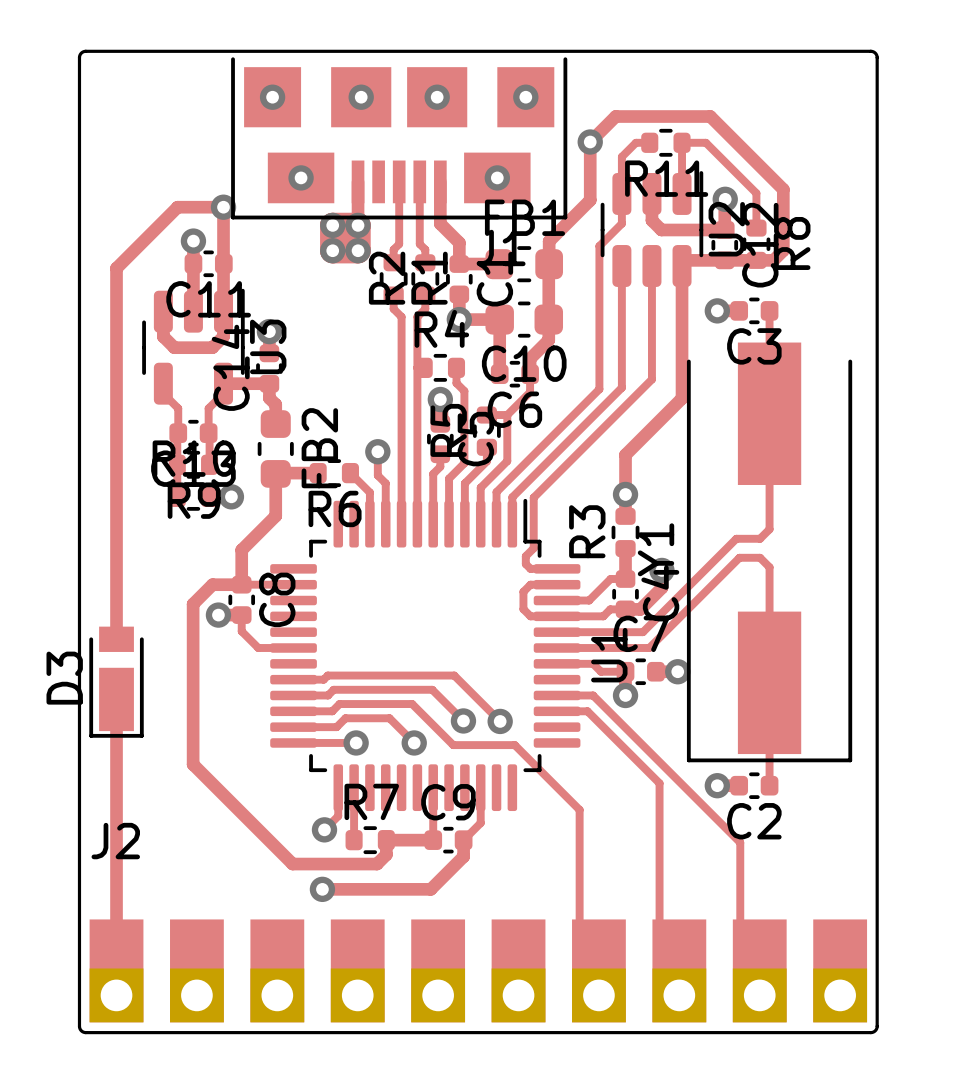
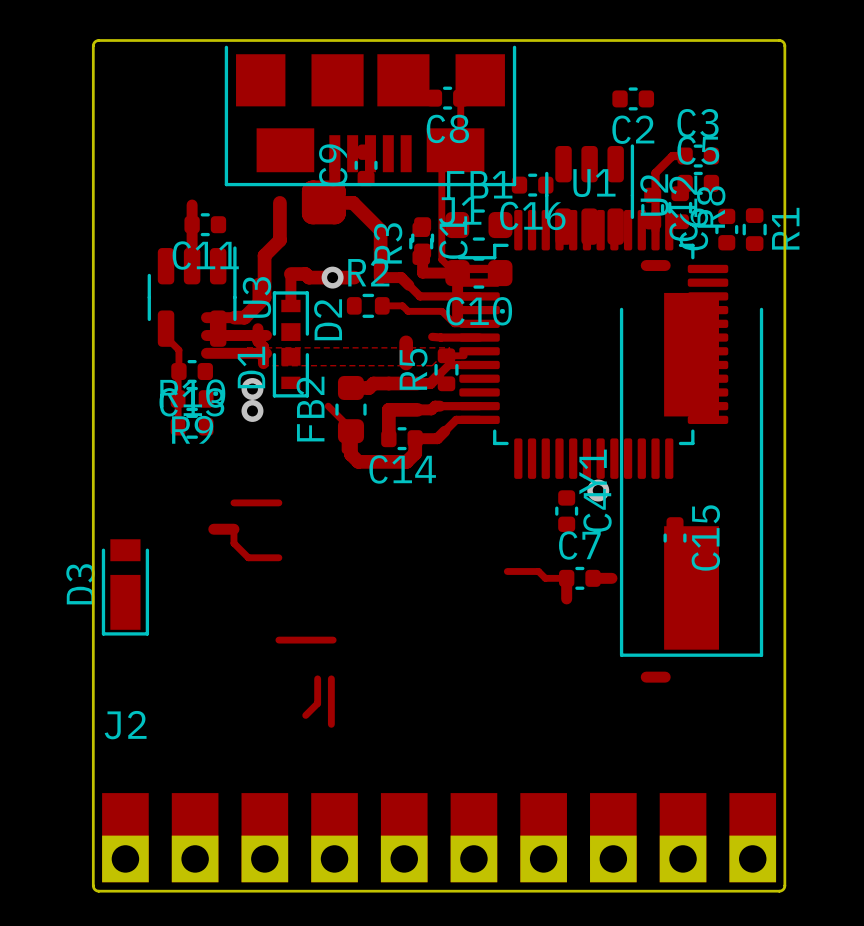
via: (272, 97) -> none
via: (361, 97) -> none
via: (437, 97) -> none
via: (525, 97) -> none
track: none -> (460, 98) (460, 129) (472, 140) (460, 152) (449, 152) (441, 159) (441, 259) (451, 268) (479, 268)
via: (590, 142) -> none
track: (649, 142) (635, 142) (621, 156) (621, 223) (599, 246) (599, 389) (496, 492) (496, 524) -> none
R11: (665, 142) -> none
via: (301, 177) -> none
via: (497, 177) -> none
track: (399, 181) (399, 244) (393, 249) (393, 262) -> none
track: (419, 181) (419, 244) (425, 249) (425, 262) -> none
track: (440, 181) (440, 223) (459, 242) (459, 264) (499, 264) -> none
track: none -> (685, 156) (672, 156) (655, 172) (655, 230)
track: (651, 193) (651, 220) (661, 229) (724, 229) (725, 199) -> none
track: (682, 193) (682, 142) (705, 142) (756, 193) (756, 228) -> none
via: (725, 199) -> none
via: (223, 207) -> none
C16: none -> (532, 185)
via: (332, 225) -> none
via: (358, 225) -> none
track: none -> (279, 202) (279, 240) (264, 255) (264, 297) (244, 317) (206, 317)
track: none -> (326, 202) (353, 202) (380, 230) (380, 277) (401, 277) (420, 296) (479, 296)
via: (193, 241) -> none
via: (332, 250) -> none
via: (358, 250) -> none
track: (223, 263) (223, 207) (177, 207) (116, 268) (116, 639) -> none
track: (223, 264) (223, 336) (212, 347) (174, 347) (163, 336) (163, 311) -> none
track: (548, 264) (548, 340) (530, 358) (530, 392) (507, 415) (507, 461) (480, 487) (480, 524) -> none
track: (549, 264) (549, 241) (590, 200) (590, 142) (615, 116) (710, 116) (783, 189) (783, 250) (773, 260) (687, 260) (682, 265) (682, 398) (625, 454) (625, 516) -> none
track: (621, 265) (621, 387) (512, 497) (512, 524) -> none
track: (651, 265) (651, 379) (533, 497) (533, 548) (525, 556) (525, 564) (530, 568) (557, 568) -> none
R1 position: (393, 278) -> (754, 229)
R2 rotation: 0° (425, 278) -> 90° clockwise (368, 305)
R2 position: (425, 278) -> (368, 305)
track: (393, 295) (393, 308) (401, 316) (401, 524) -> none
track: (425, 295) (425, 308) (417, 316) (417, 524) -> none
via: (717, 310) -> none
C3 position: (754, 310) -> (698, 156)
track: (769, 310) (769, 529) (760, 538) (736, 538) (642, 632) (557, 632) -> none
via: (459, 319) -> none
via: none -> (332, 277)
track: none -> (354, 277) (309, 277) (305, 274) (290, 274) (290, 306)
via: (269, 331) -> none
C3 name position: C3 (754, 346) -> C3 (698, 123)
track: none -> (382, 305) (402, 305) (408, 311) (441, 311) (454, 323) (479, 323)
R4: (440, 367) -> none
track: (456, 367) (456, 383) (464, 391) (464, 463) (449, 478) (449, 524) -> none
C14 rotation: 0° (269, 368) -> 90° clockwise (402, 438)
C14 position: (269, 368) -> (402, 438)
D2: none -> (290, 316)
C6 rotation: 0° (514, 374) -> 90° clockwise (726, 229)
C6 position: (514, 374) -> (726, 229)
track: (269, 383) (223, 383) (223, 393) (208, 408) (209, 464) -> none
track: none -> (206, 335) (266, 335)
track: none -> (432, 336) (479, 337)
via: (440, 399) -> none
zone outline: none -> (246, 347) (264, 365) (432, 365) (450, 347) (246, 347)
track: none -> (206, 353) (266, 353)
D1: none -> (290, 372)
C5 rotation: 0° (440, 439) -> 90° clockwise (698, 183)
C5 position: (440, 439) -> (698, 183)
track: (486, 447) (486, 461) (464, 483) (464, 524) -> none
FB2 position: (275, 448) -> (350, 409)
FB2 name position: FB2 (319, 448) -> FB2 (310, 409)
track: (377, 451) (377, 475) (385, 483) (385, 524) -> (350, 387) (369, 387) (373, 383) (430, 383) (448, 364) (479, 364)
via: (377, 451) -> none
via: none -> (252, 389)
track: (440, 454) (440, 466) (433, 473) (433, 524) -> none
track: (318, 473) (275, 473) (275, 516) (241, 550) (241, 584) (212, 584) (193, 604) (193, 764) (292, 864) (377, 864) (386, 854) (386, 840) (433, 840) (433, 787) -> none
R6: (334, 473) -> none
track: none -> (479, 406) (435, 406) (431, 409) (388, 409) (388, 438)
via: none -> (252, 410)
track: none -> (479, 419) (456, 419) (437, 438) (415, 438) (415, 453) (406, 461) (358, 461) (350, 454) (350, 431)
via: (625, 494) -> none
via: (231, 496) -> none
R3 position: (625, 532) -> (421, 243)
track: (625, 548) (625, 578) (610, 578) (589, 600) (557, 600) -> none
track: (661, 570) (661, 587) (640, 609) (610, 609) (603, 616) (530, 616) (523, 609) (523, 591) (530, 584) (557, 584) -> none
C8 rotation: 0° (241, 599) -> 90° clockwise (447, 98)
C8 position: (241, 599) -> (447, 98)
via: (218, 615) -> none
C15: none -> (675, 538)
track: (557, 648) (649, 648) (739, 557) (760, 557) (769, 567) (769, 785) -> none
U1 rotation: 0° (425, 654) -> 90° counterclockwise (592, 344)
U1 position: (425, 654) -> (592, 344)
via: (677, 671) -> none
track: (293, 679) (323, 679) (327, 675) (454, 675) (500, 721) -> none
track: (293, 695) (328, 695) (333, 689) (432, 689) (463, 720) -> none
track: (557, 695) (593, 695) (740, 842) (740, 951) (759, 970) -> none
via: (625, 695) -> none
track: (116, 699) (116, 970) -> none
track: (293, 711) (332, 711) (339, 704) (412, 704) (453, 745) (514, 745) (579, 809) (579, 951) (598, 970) -> none
track: (557, 711) (587, 711) (659, 783) (659, 951) (679, 970) -> none
via: (463, 720) -> none
via: (500, 721) -> none
track: (293, 727) (336, 727) (345, 718) (389, 718) (414, 742) -> none
via: (356, 742) -> none
via: (414, 742) -> none
via: (717, 785) -> none
C2 position: (754, 785) -> (633, 98)
track: (480, 787) (480, 823) (463, 840) (463, 856) (430, 889) (322, 889) -> none
via: (324, 829) -> none
R7: (370, 840) -> none
C9 rotation: 0° (448, 840) -> 90° clockwise (366, 165)
C9 position: (448, 840) -> (366, 165)
via: (322, 889) -> none

